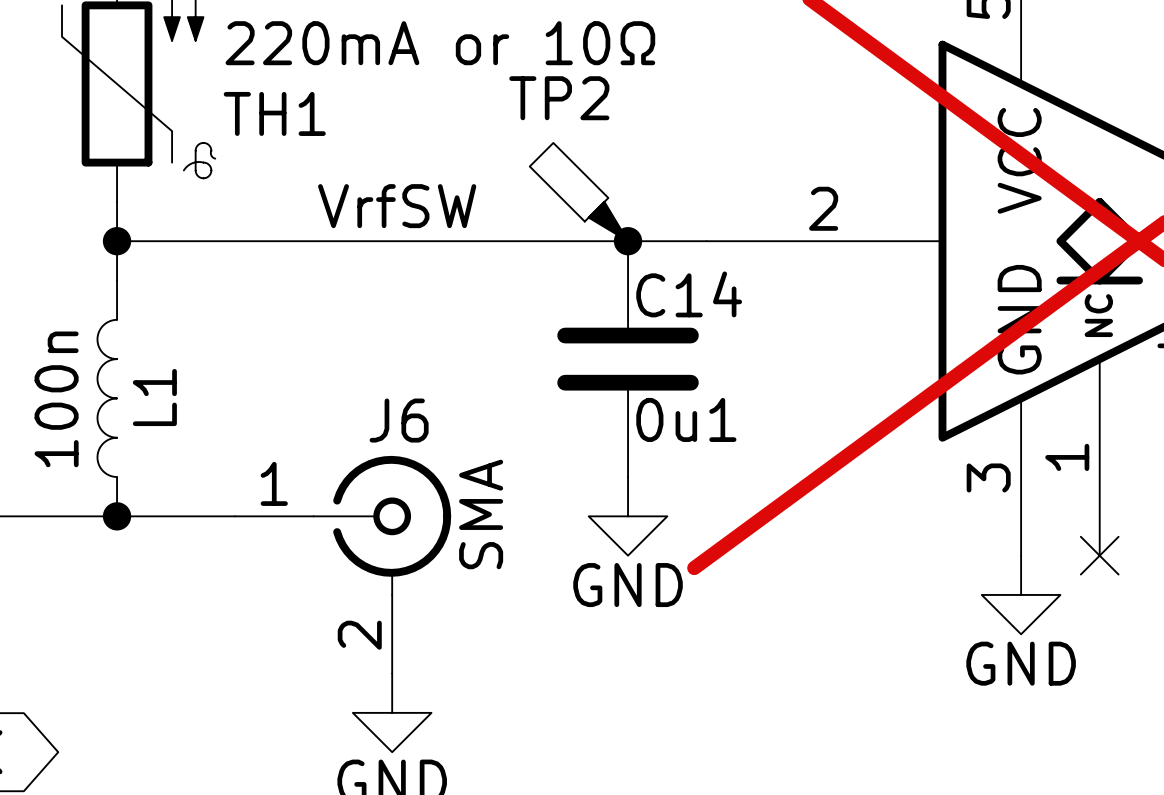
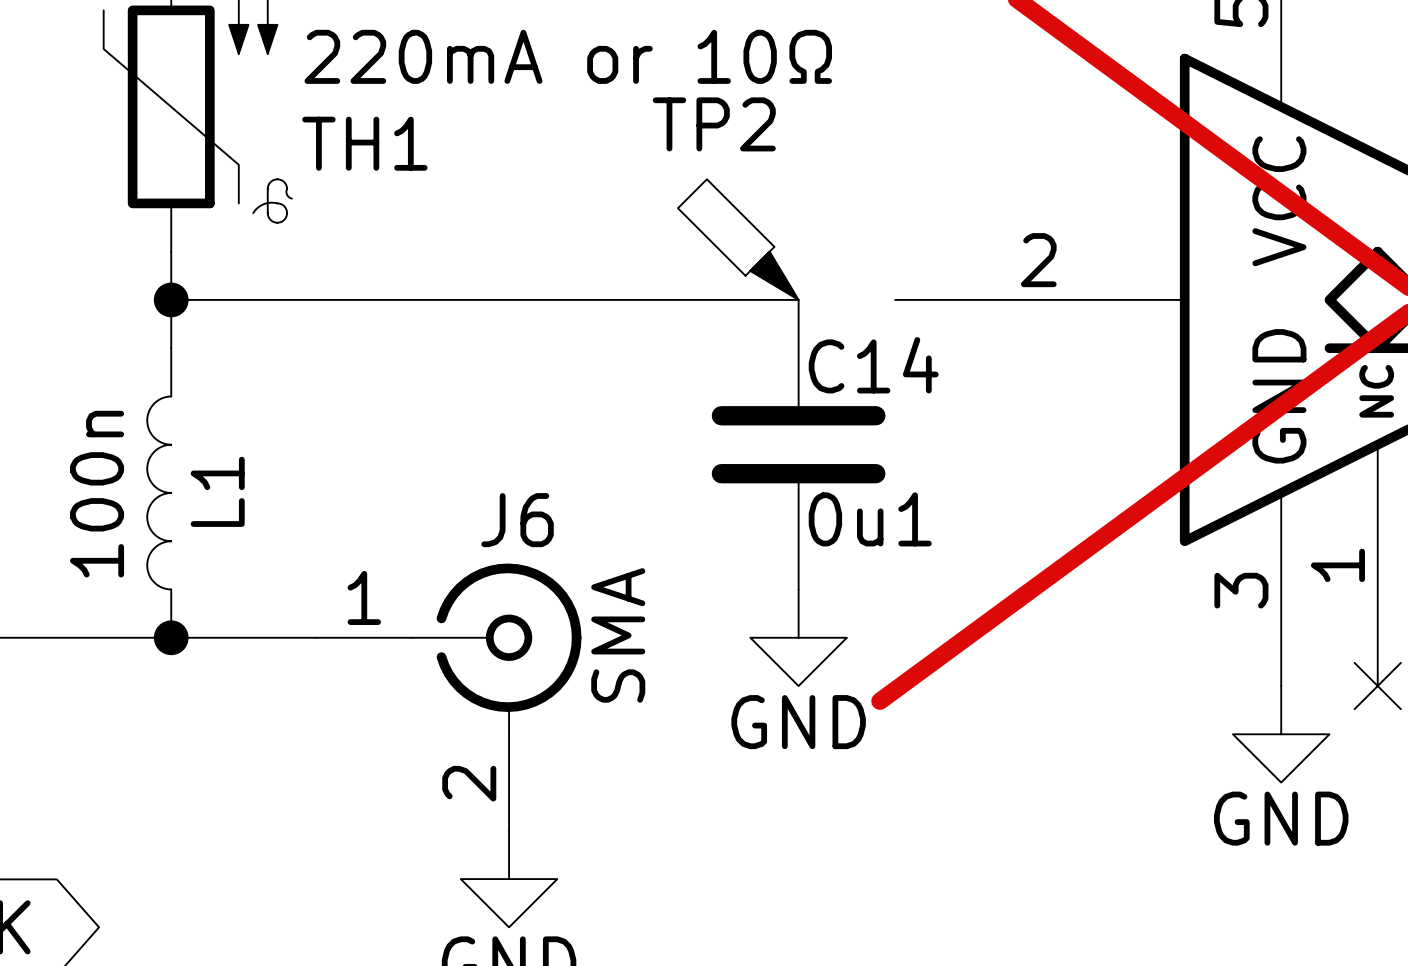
label: VrfSW (397, 206) -> none
wire: (628, 241) (706, 241) -> none
junction: (628, 241) -> none

